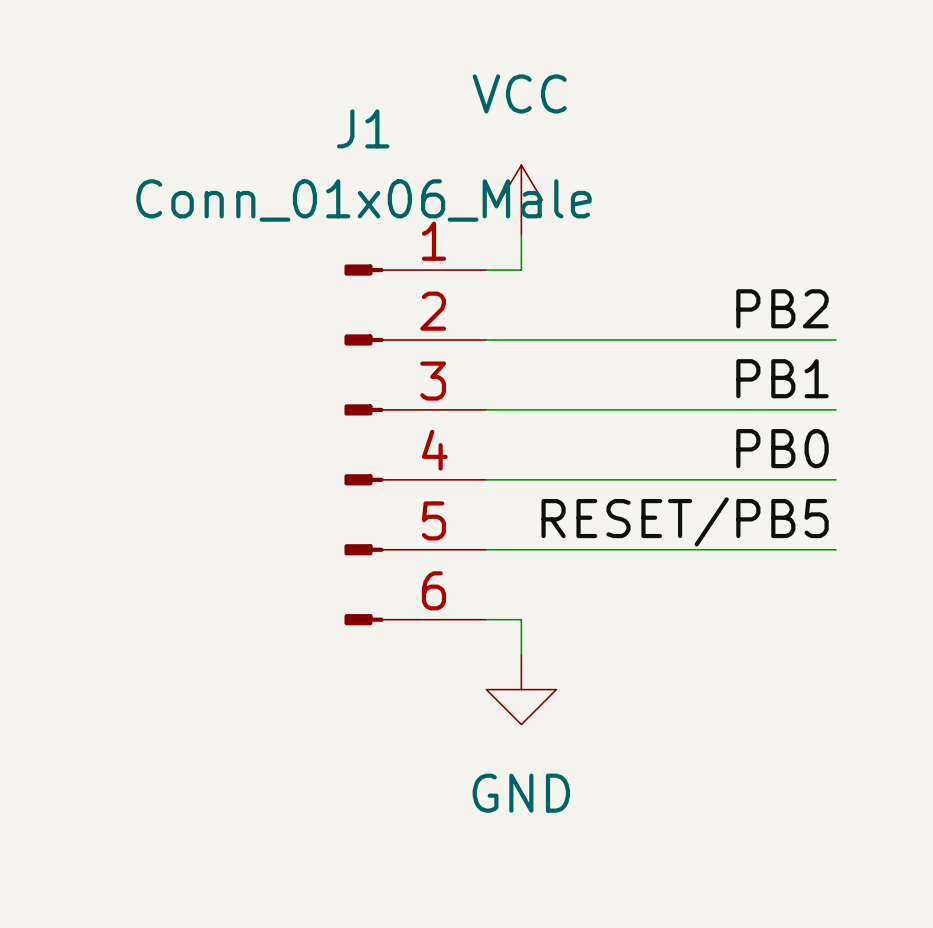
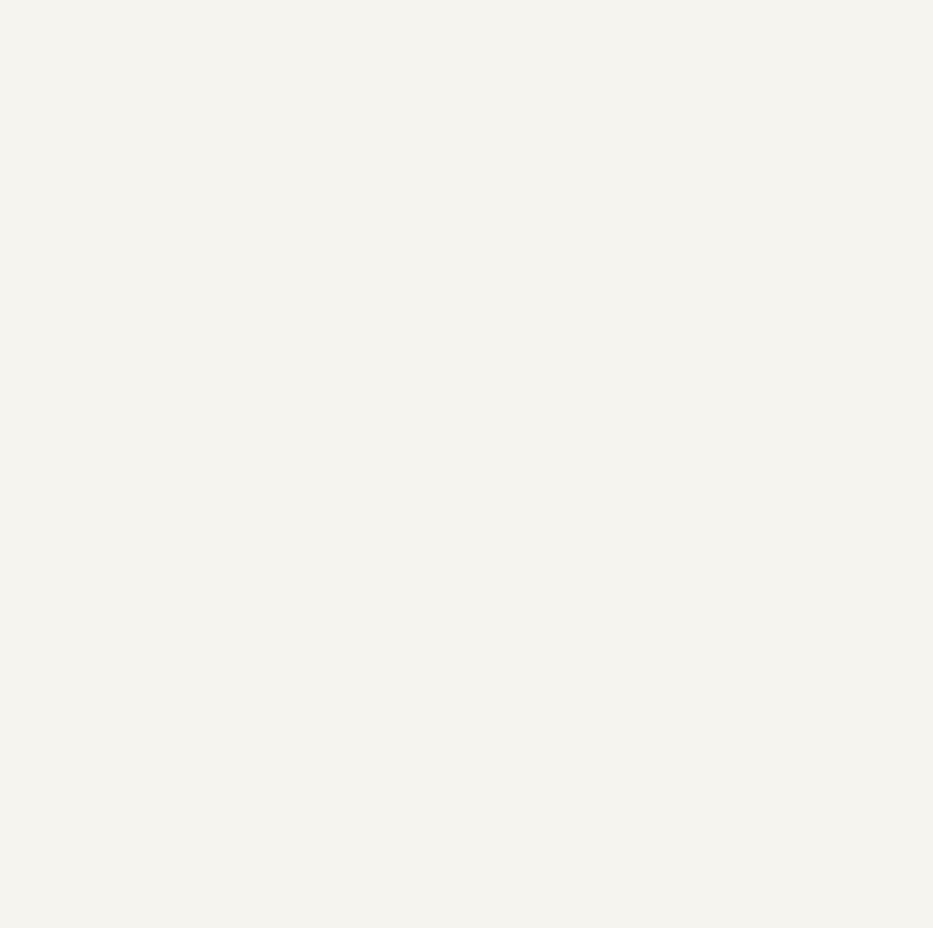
power symbol: VCC (521, 200) -> none
wire: (521, 235) (521, 270) (486, 270) -> none
label: PB2 (782, 308) -> none
wire: (486, 339) (836, 339) -> none
label: PB1 (782, 378) -> none
wire: (486, 409) (836, 409) -> none
J1: Conn_01x06_Male (415, 444) -> none
label: PB0 (782, 448) -> none
wire: (486, 479) (836, 479) -> none
label: RESET/PB5 (685, 521) -> none
wire: (486, 549) (836, 549) -> none
wire: (486, 619) (521, 619) (521, 654) -> none
power symbol: GND (521, 689) -> none

